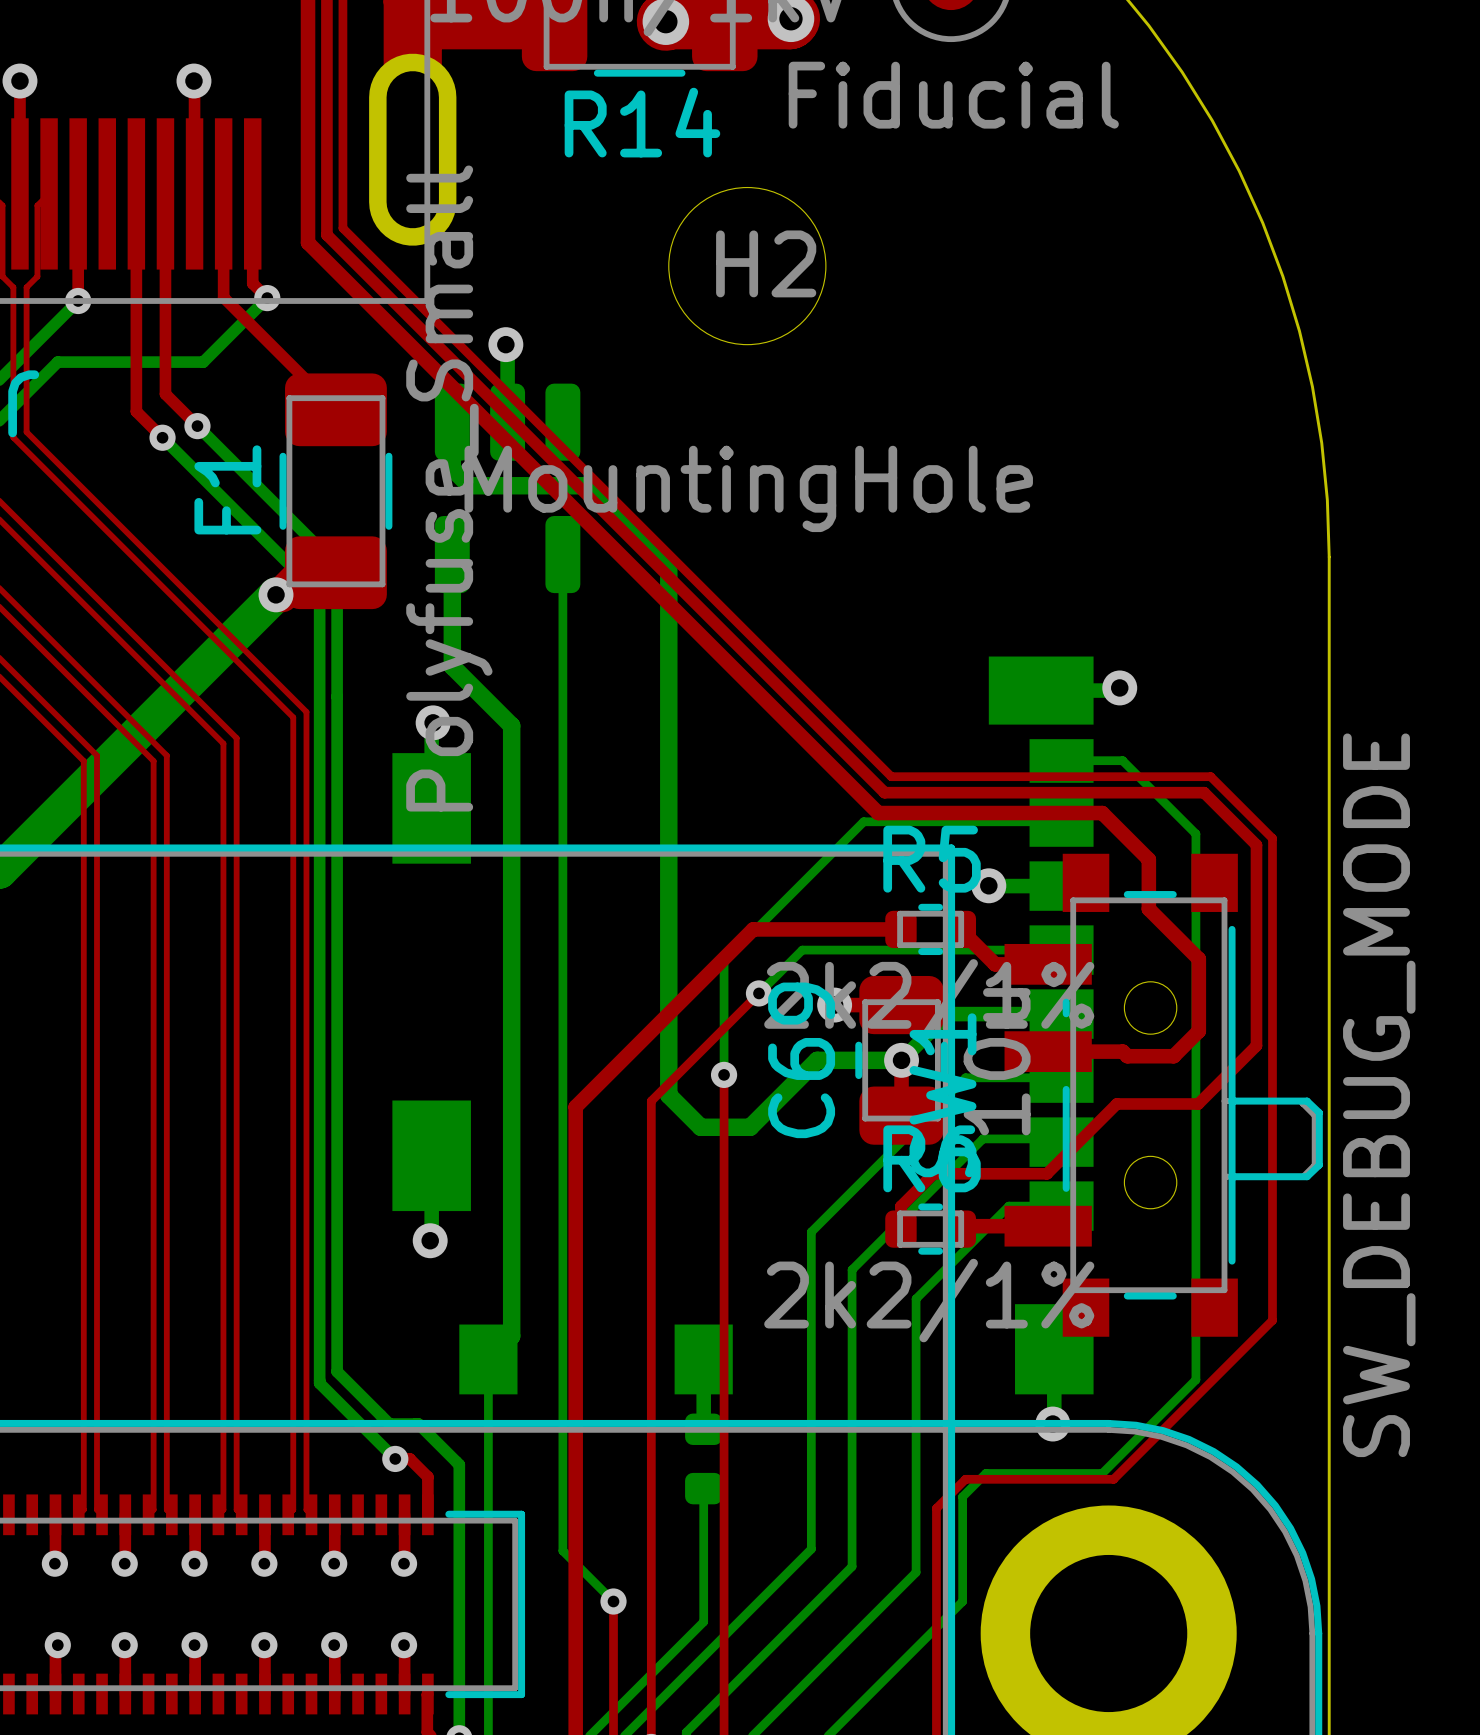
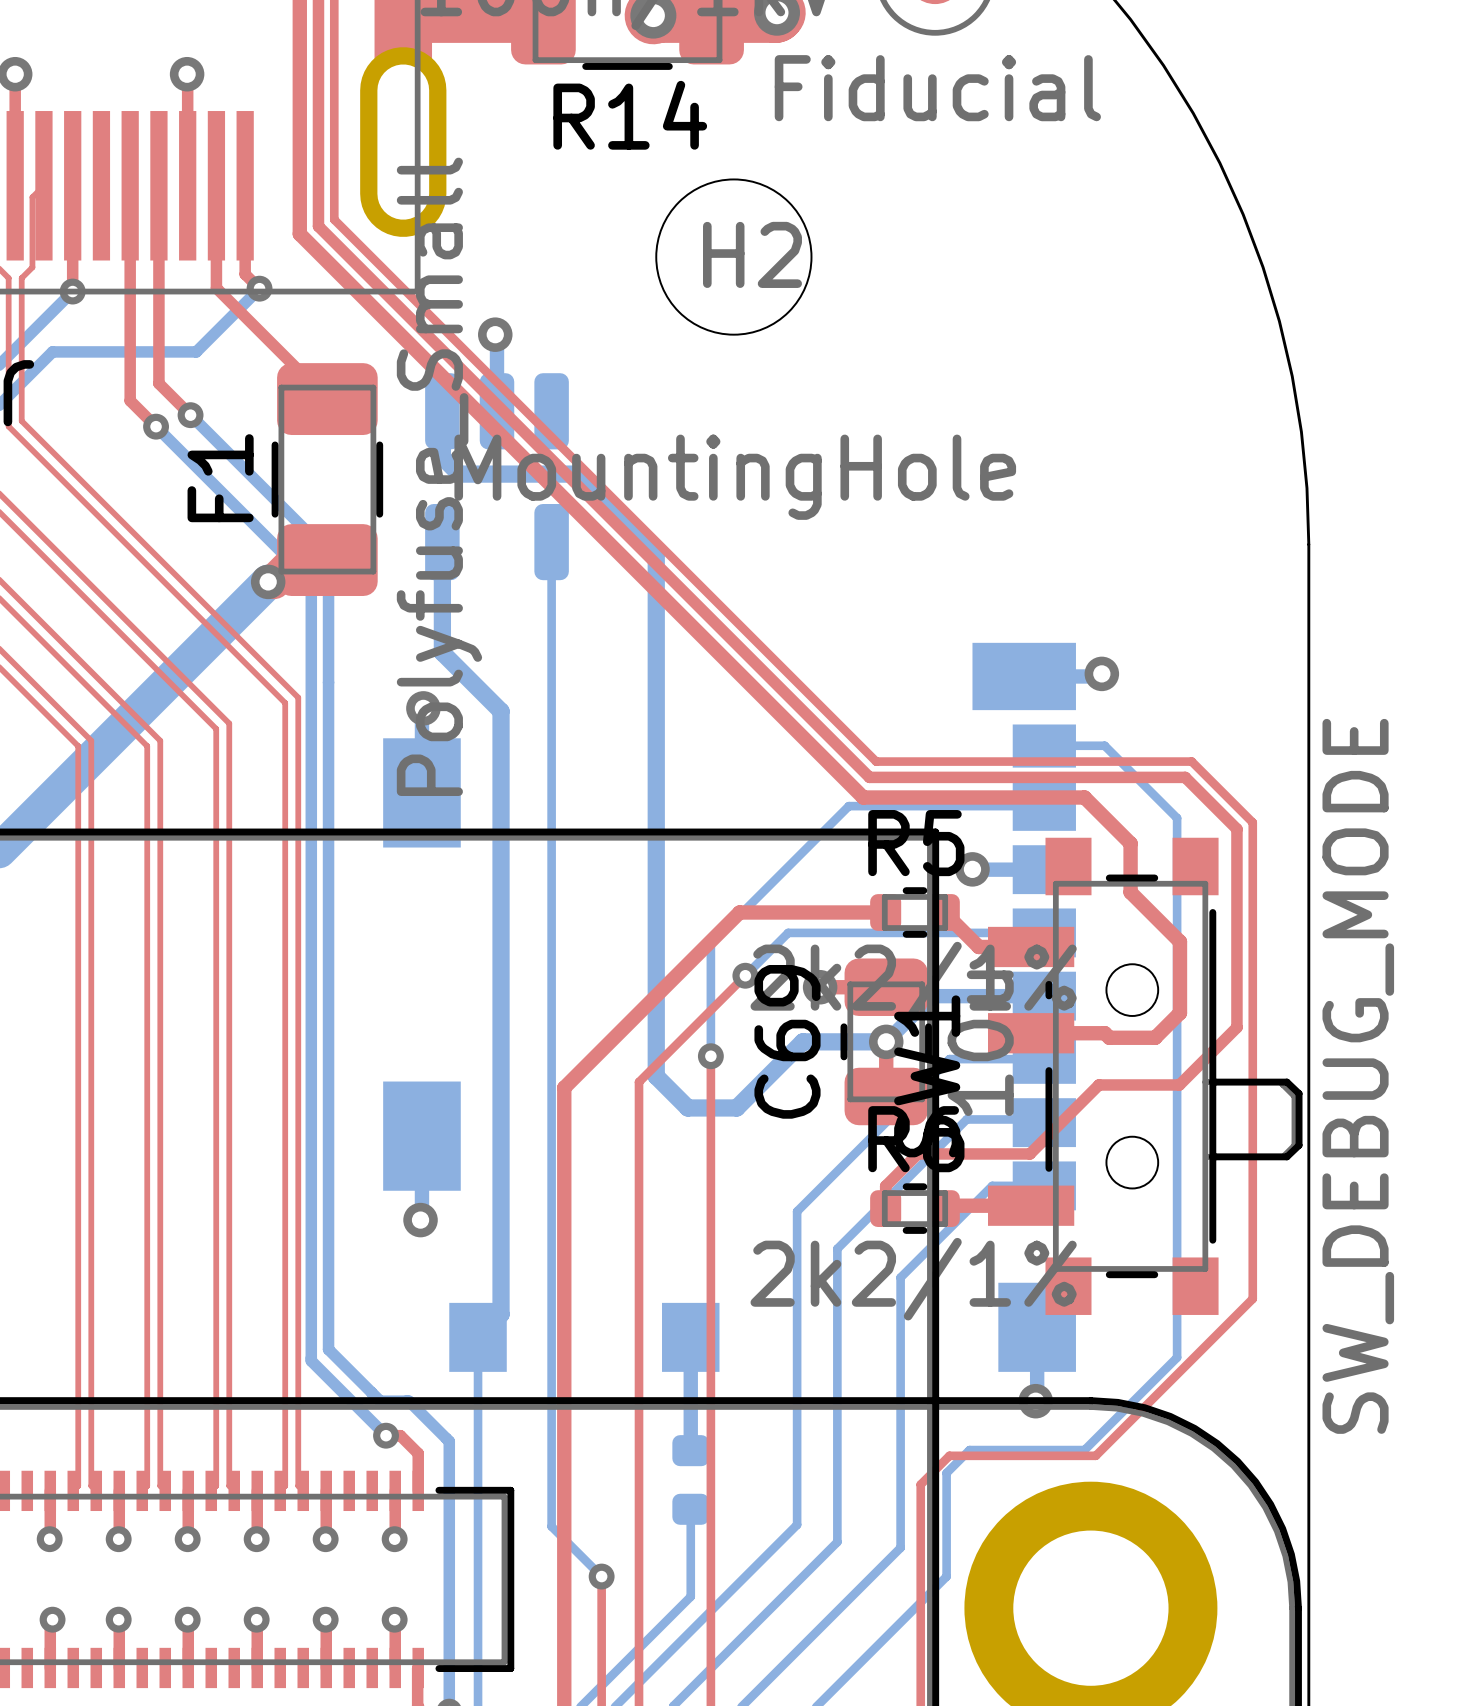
part position: (703, 1458) -> (690, 1479)
bottom track: (703, 1488) (703, 1533) -> (690, 1406) (690, 1450)

